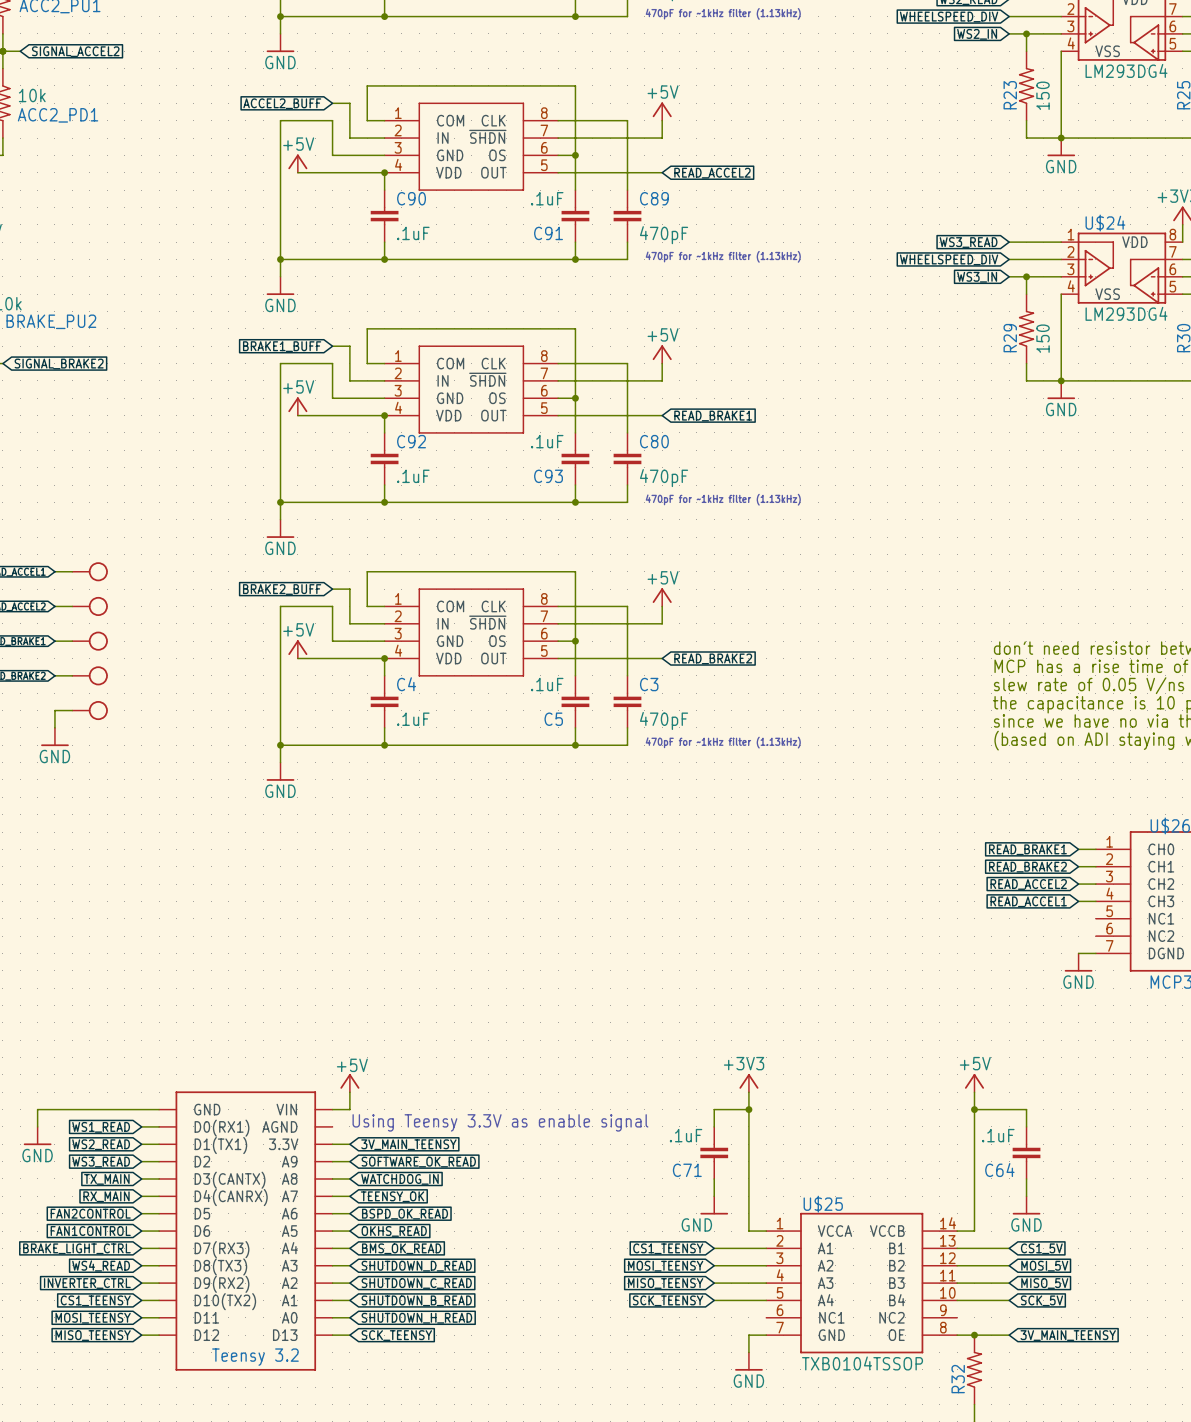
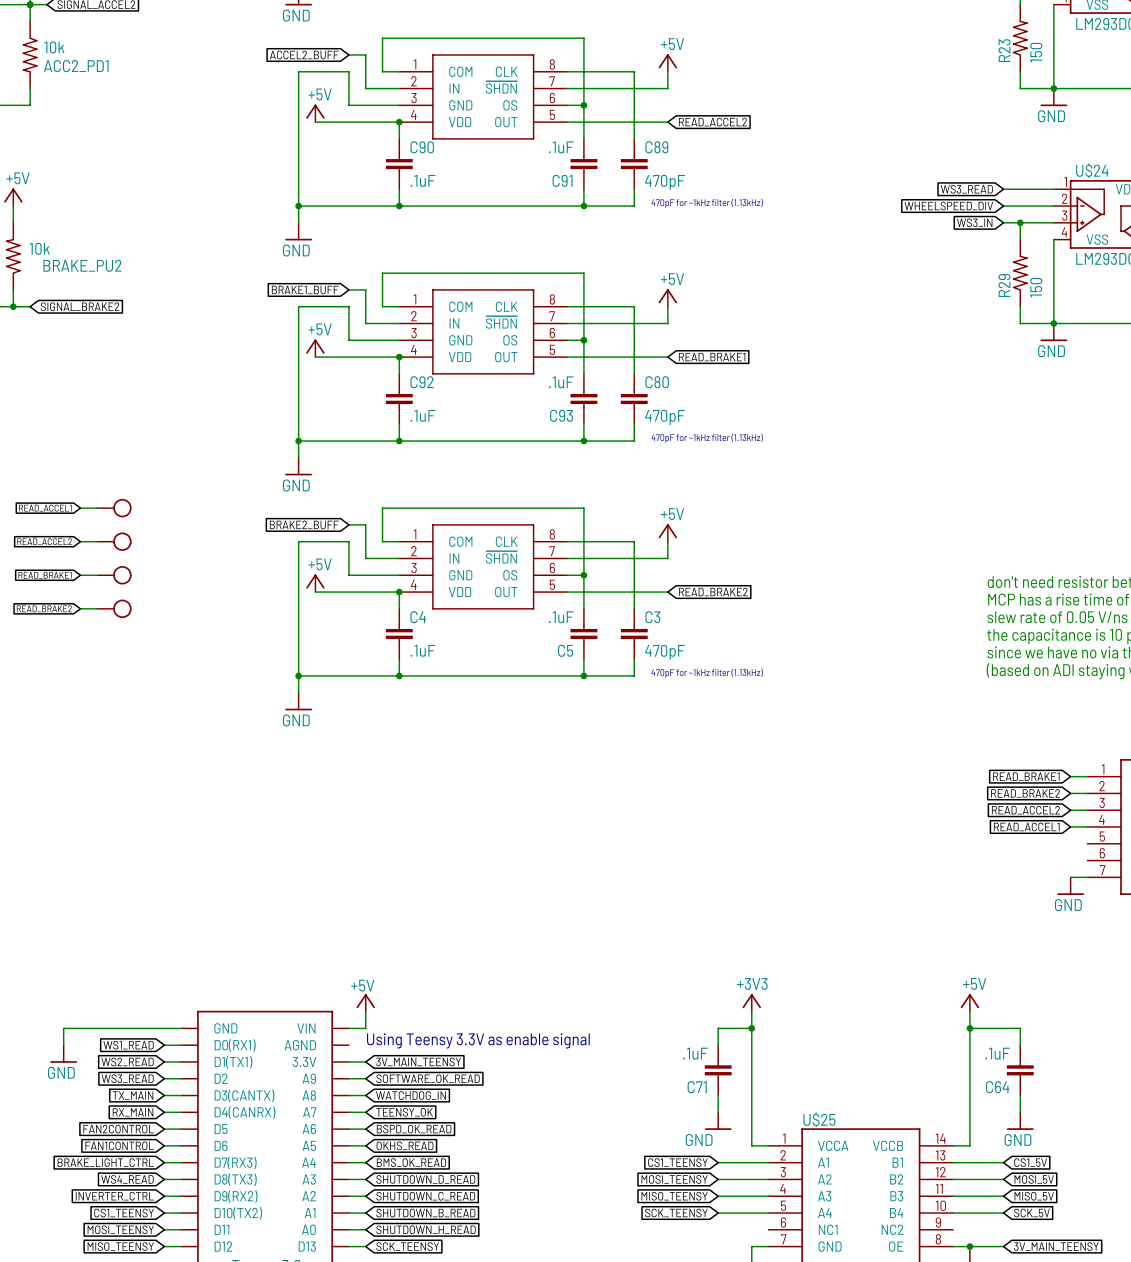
wire: (72, 710) (54, 710) (54, 727) -> none
part: (90, 710) -> none
power symbol: GND (54, 737) -> none

